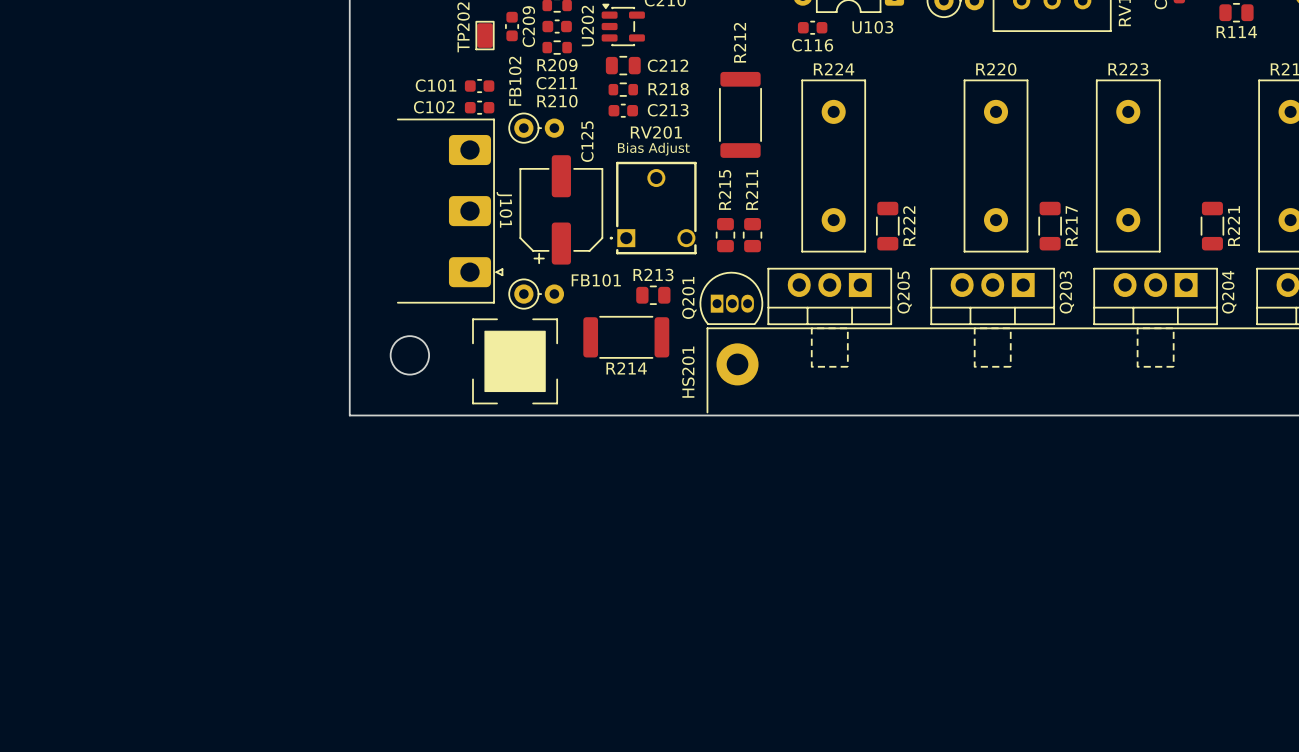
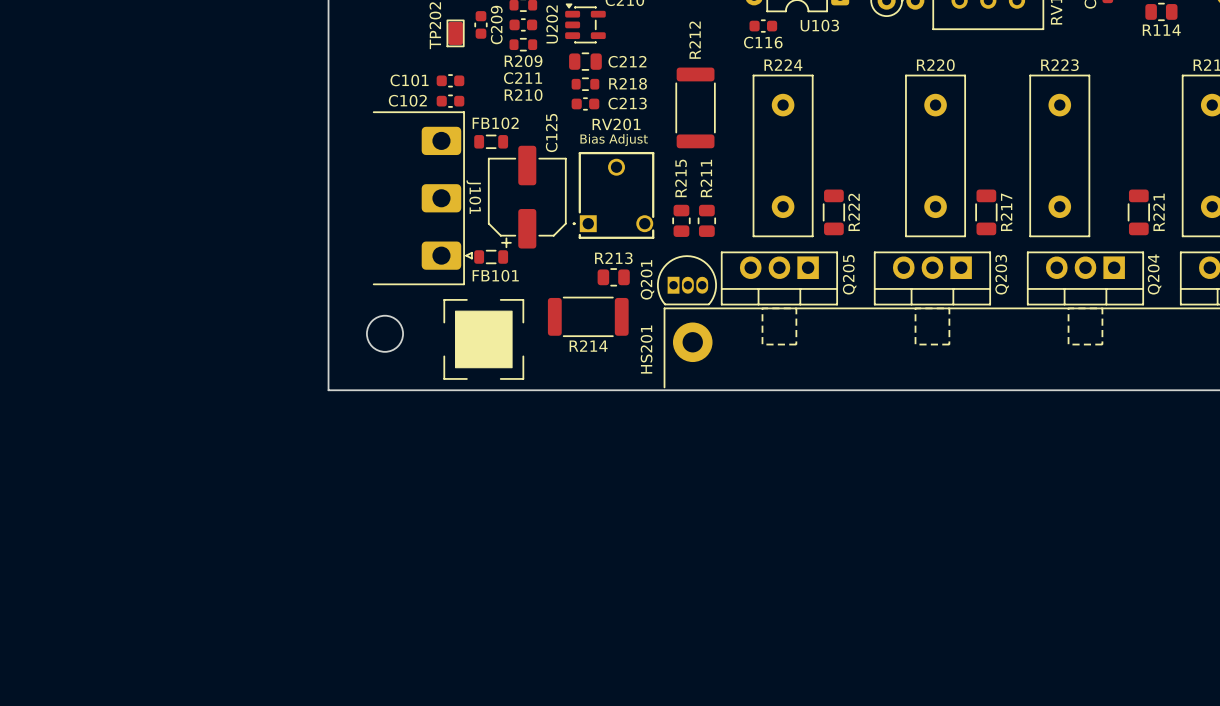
FB102 name position: FB102 (515, 81) -> FB102 (495, 123)
FB102 footprint: [508, 112, 565, 144] -> [474, 134, 509, 149]
FB101 footprint: [508, 278, 565, 310] -> [474, 250, 509, 265]
FB101 name position: FB101 (596, 280) -> FB101 (495, 275)

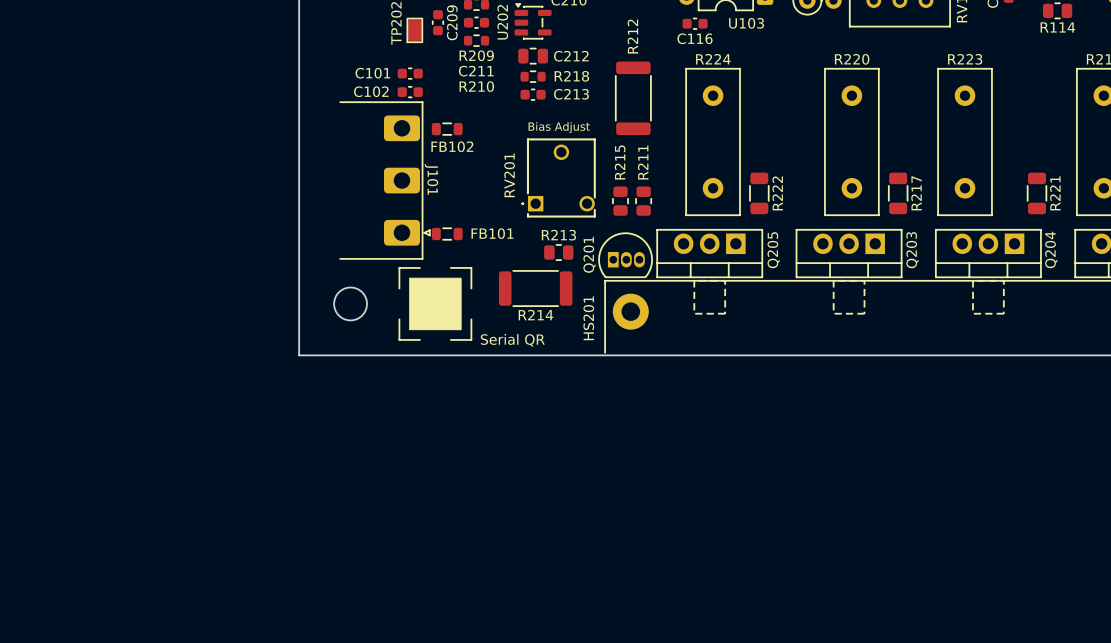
FB102 name position: FB102 (495, 123) -> FB102 (452, 146)
RV201 name rotation: 0° (616, 124) -> 90° counterclockwise (509, 175)
RV201 name position: RV201 (616, 124) -> RV201 (509, 175)
C125: (527, 197) -> none
FB101 name position: FB101 (495, 275) -> FB101 (492, 233)
drawing shape: [443, 299, 525, 380] -> [398, 267, 545, 347]

